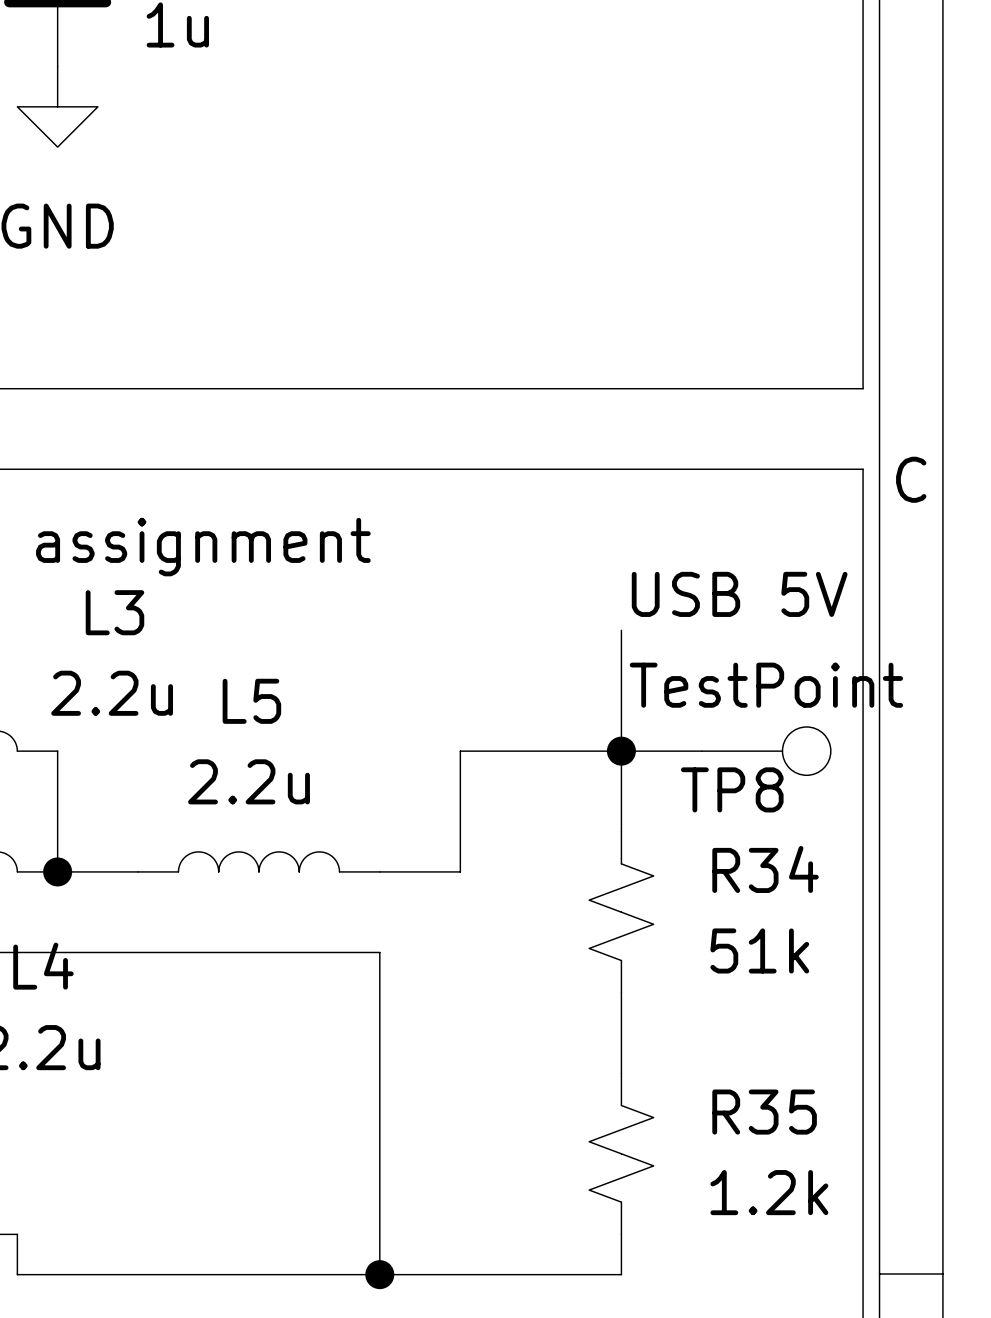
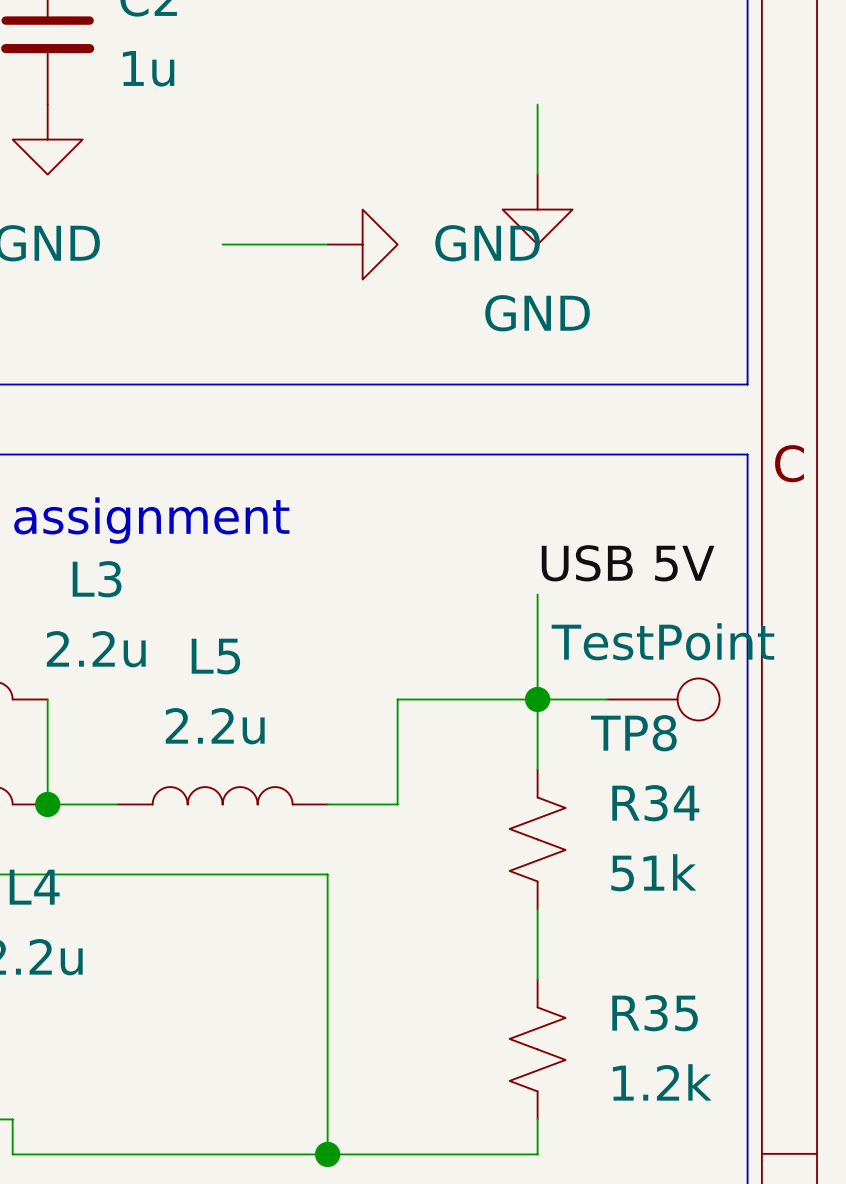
wire: none -> (537, 104) (537, 174)
power symbol: none -> GND (537, 209)
wire: none -> (222, 244) (327, 244)
power symbol: none -> GND (362, 244)

